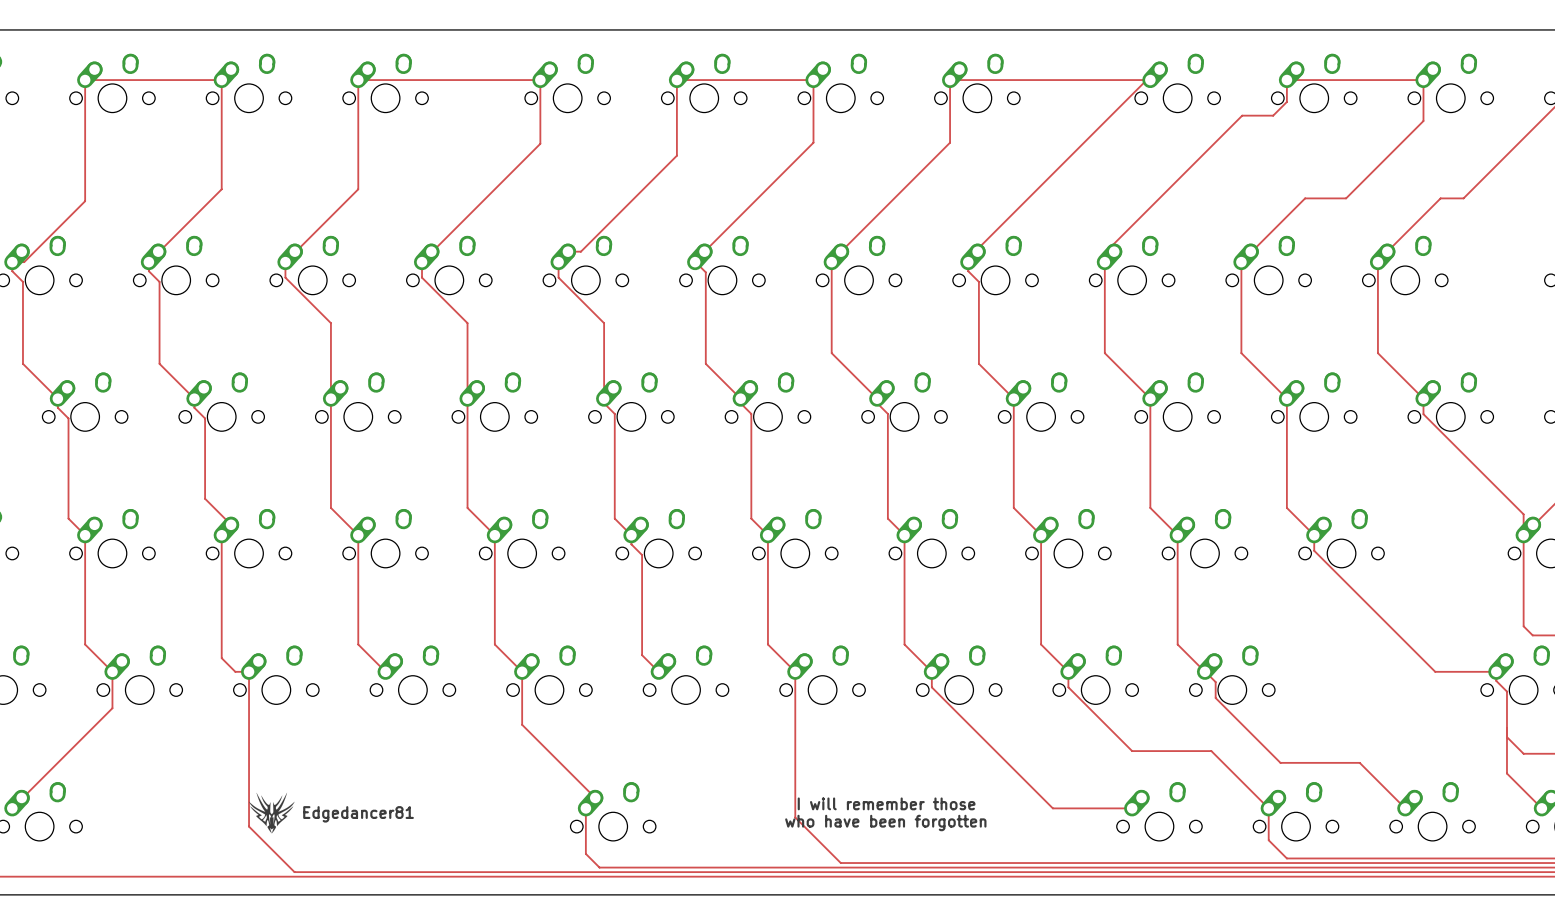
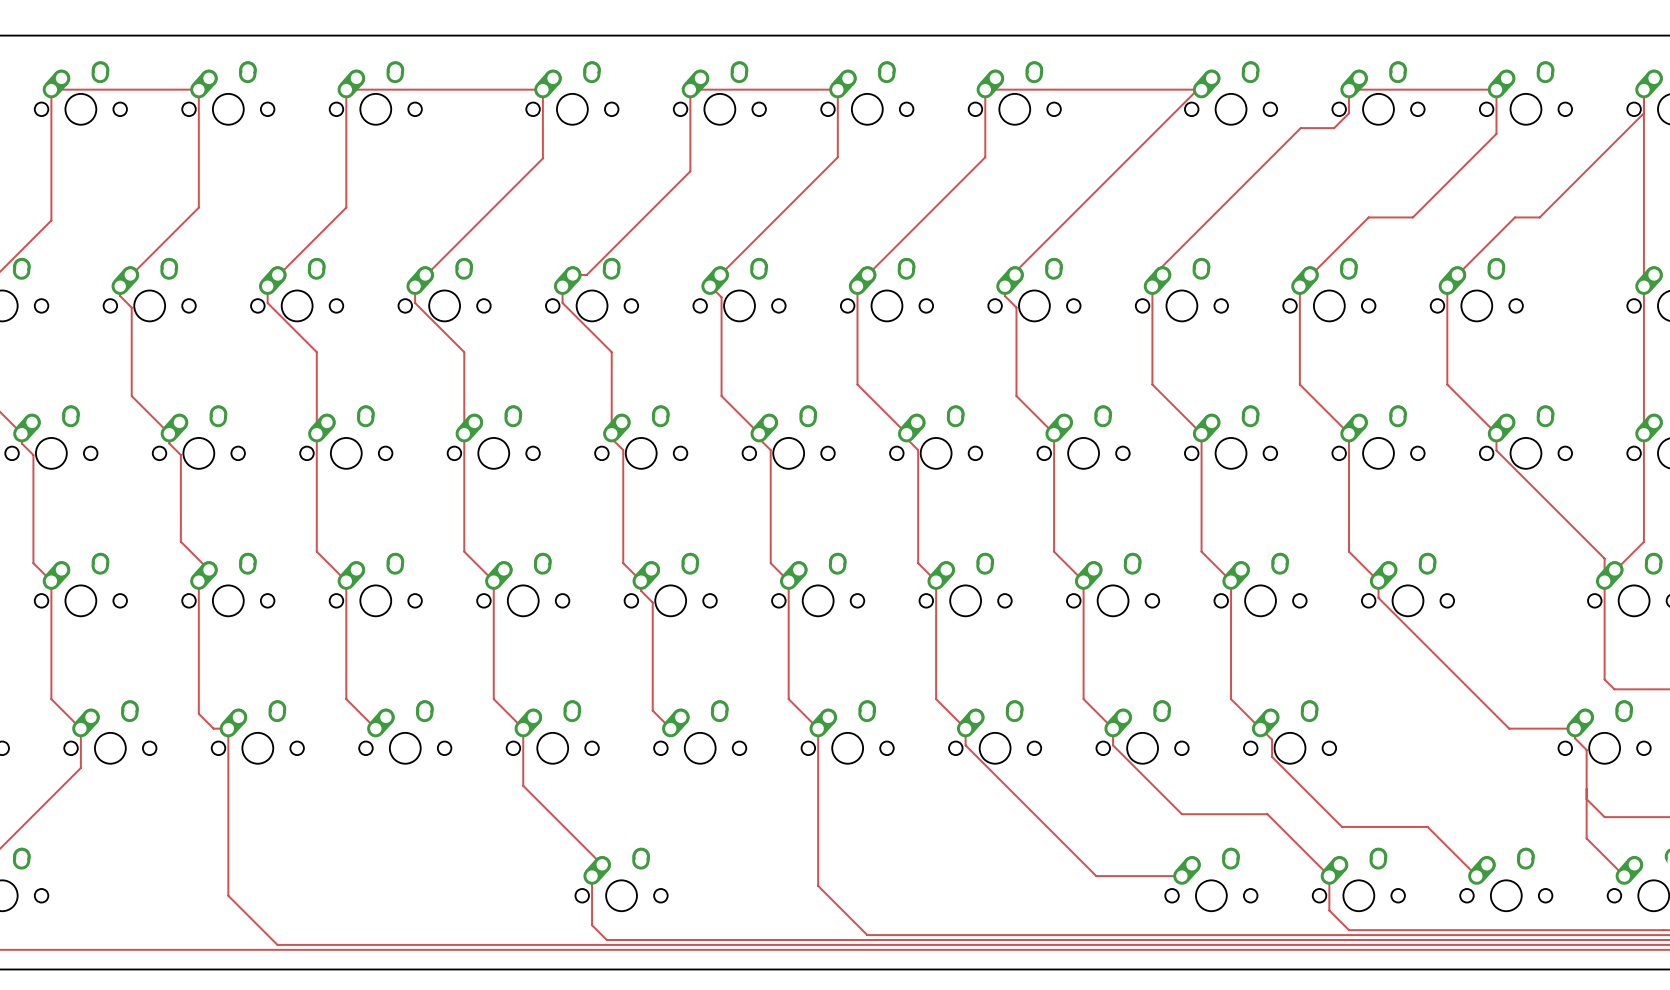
drawing: [248, 792, 295, 834] -> none
text: I will remember those (886, 803) -> none
text: Edgedancer81 (358, 814) -> none
text: who have been forgotten (885, 822) -> none

